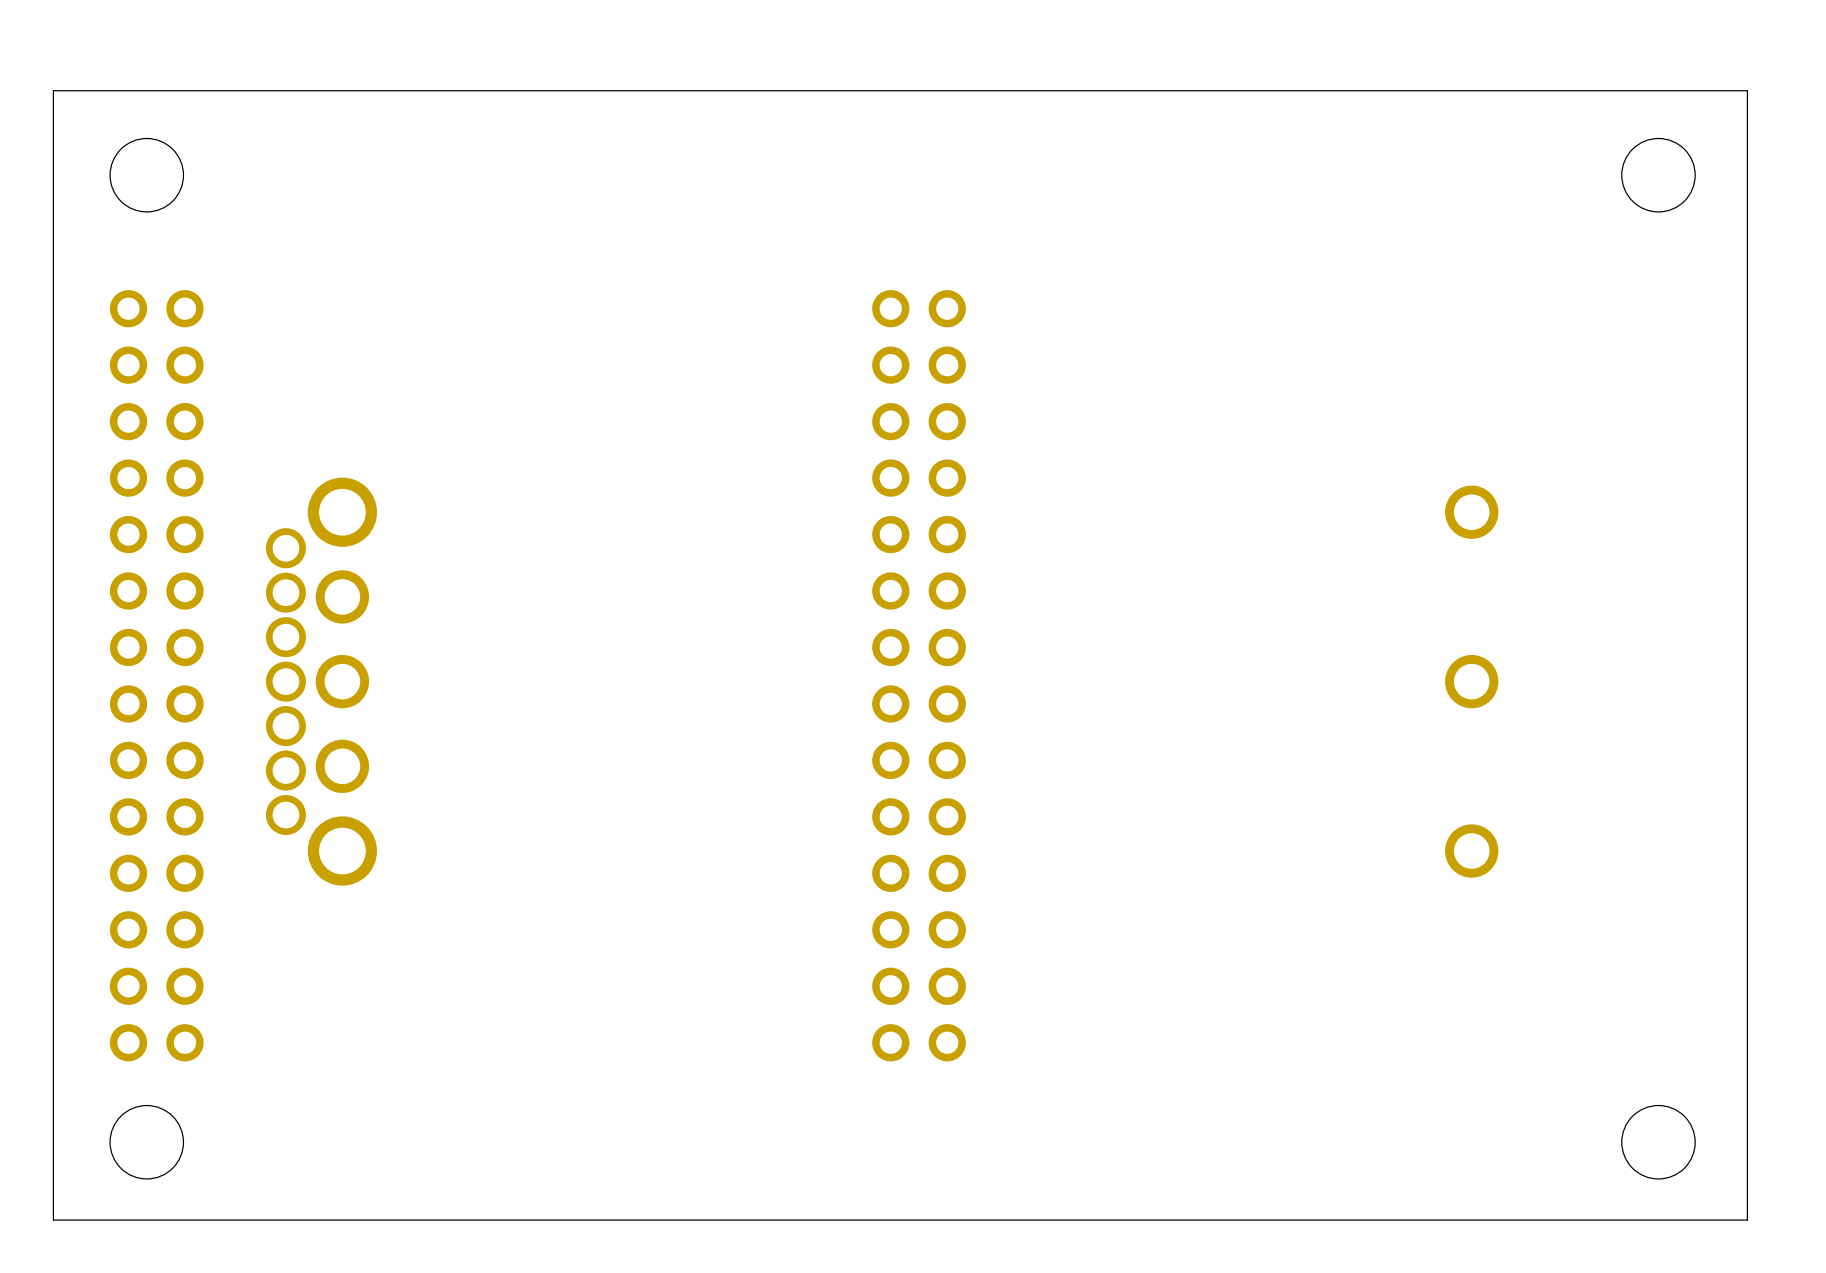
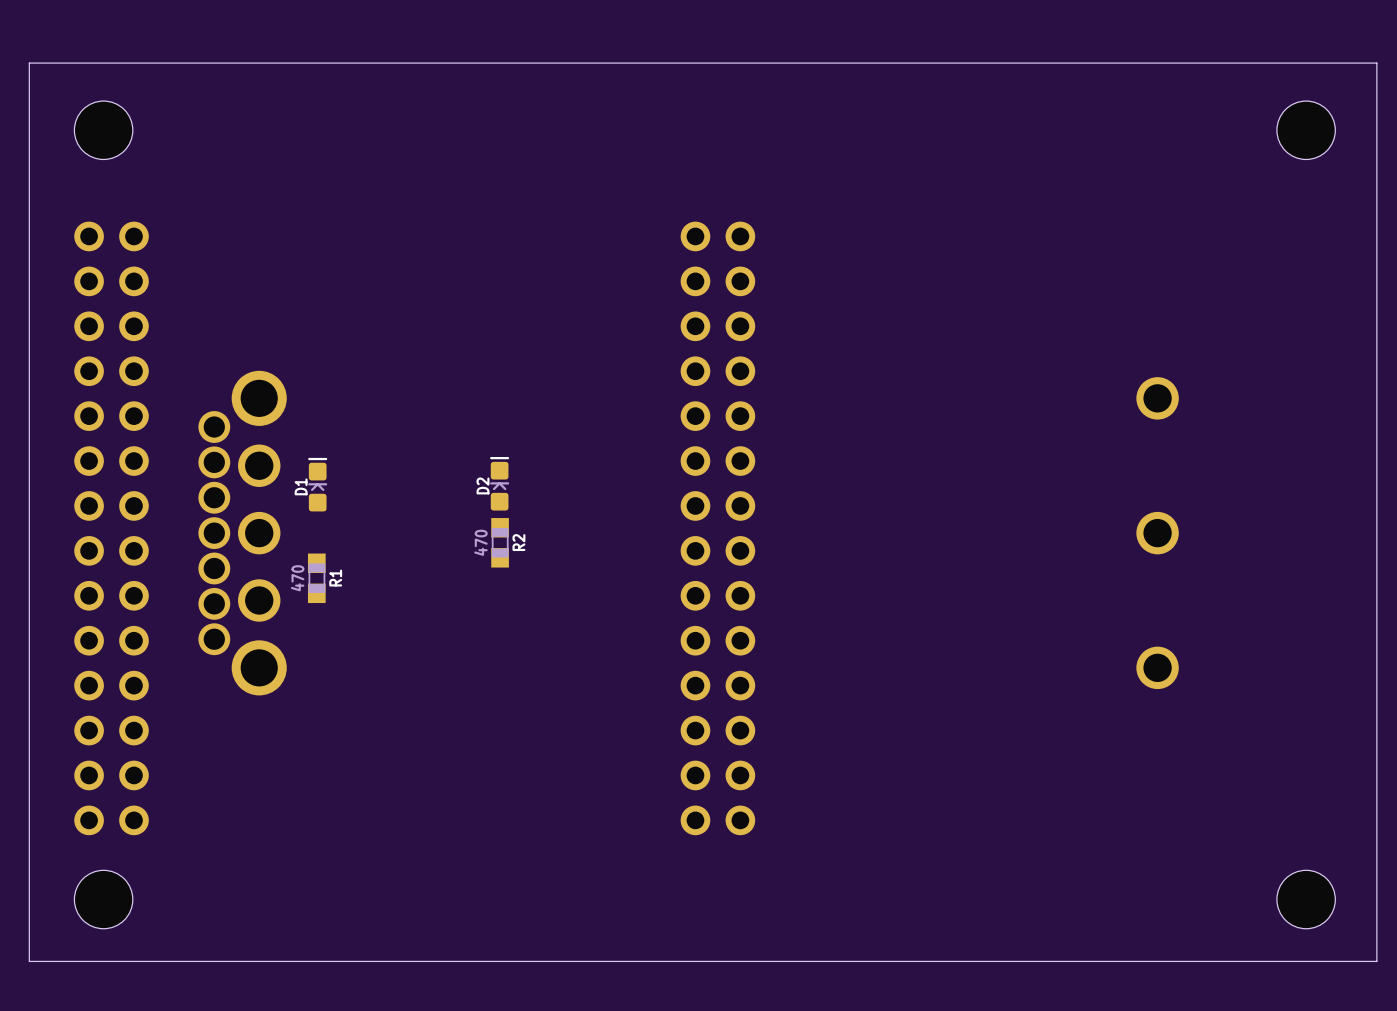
D2: none -> (499, 483)
D1: none -> (317, 484)
R2: none -> 470 (500, 542)
R1: none -> 470 (316, 578)

